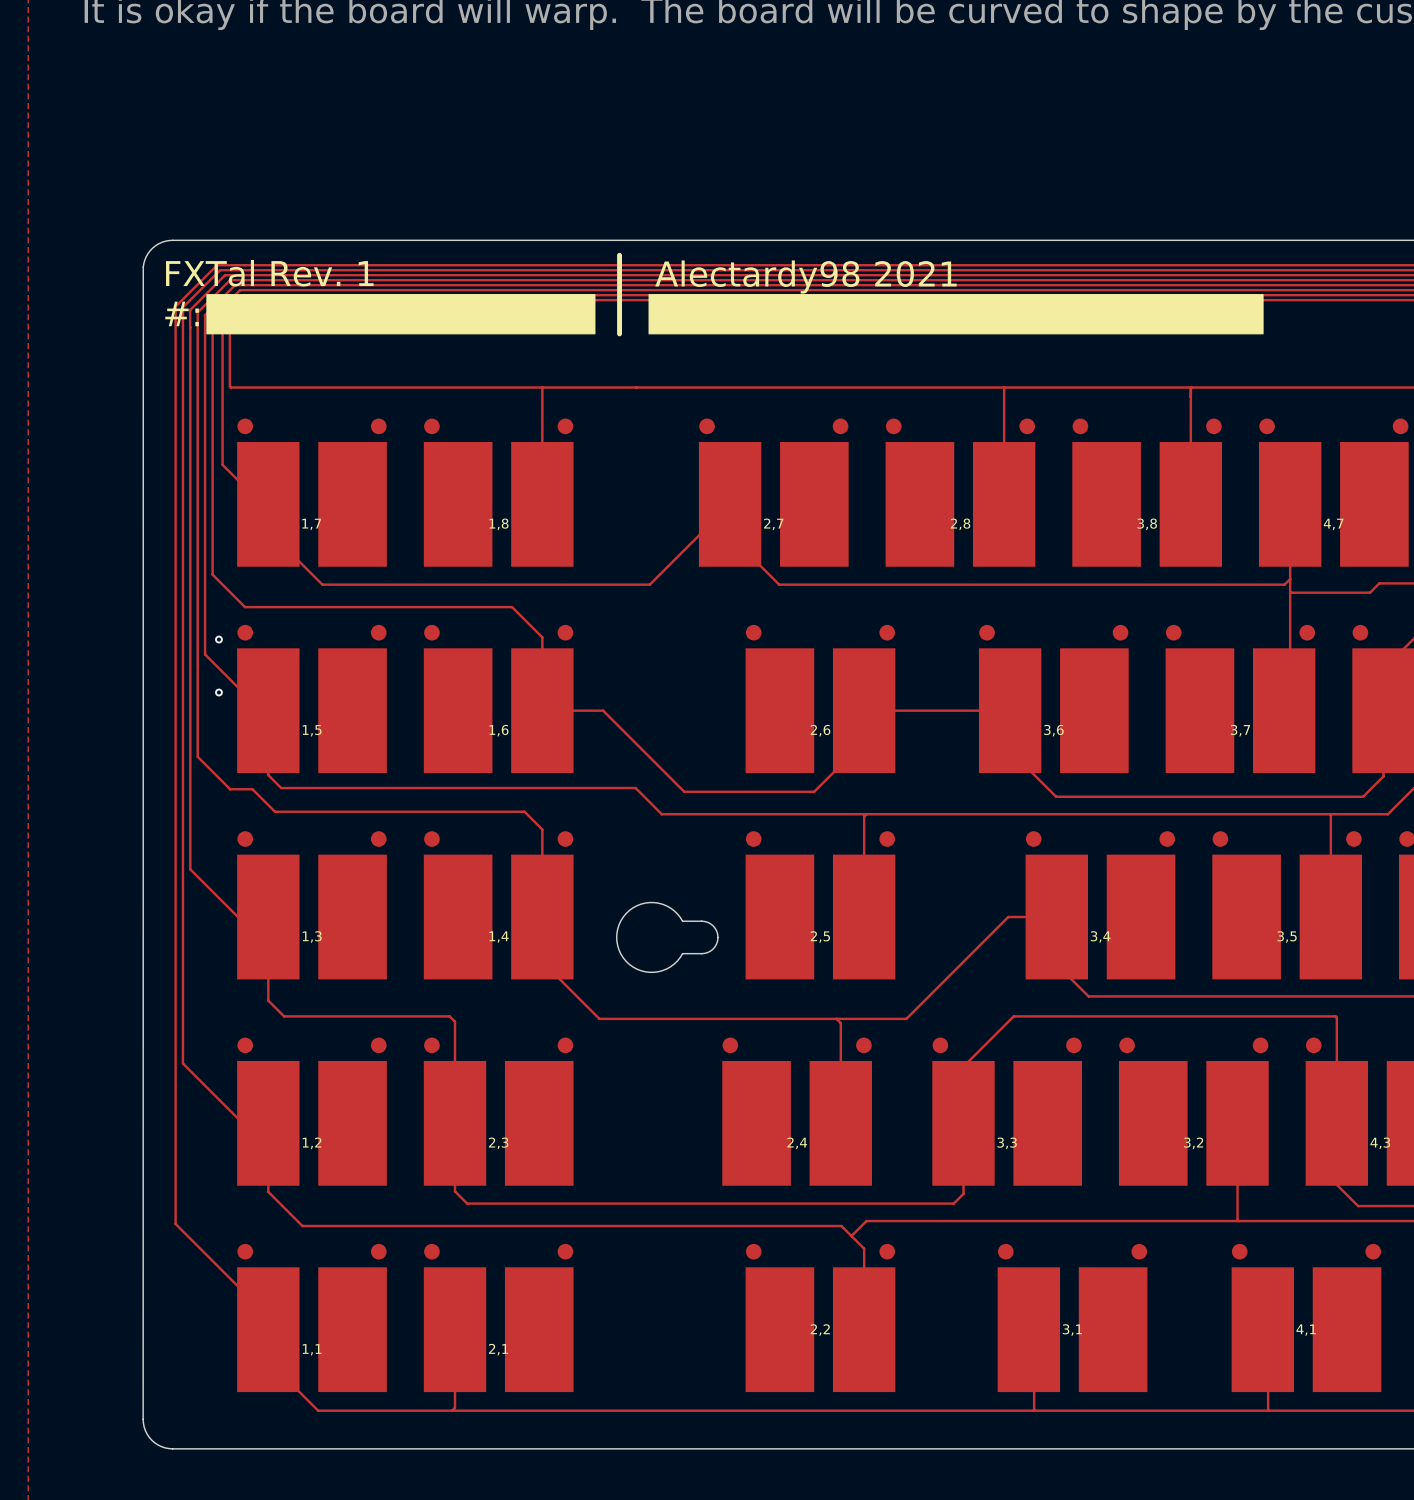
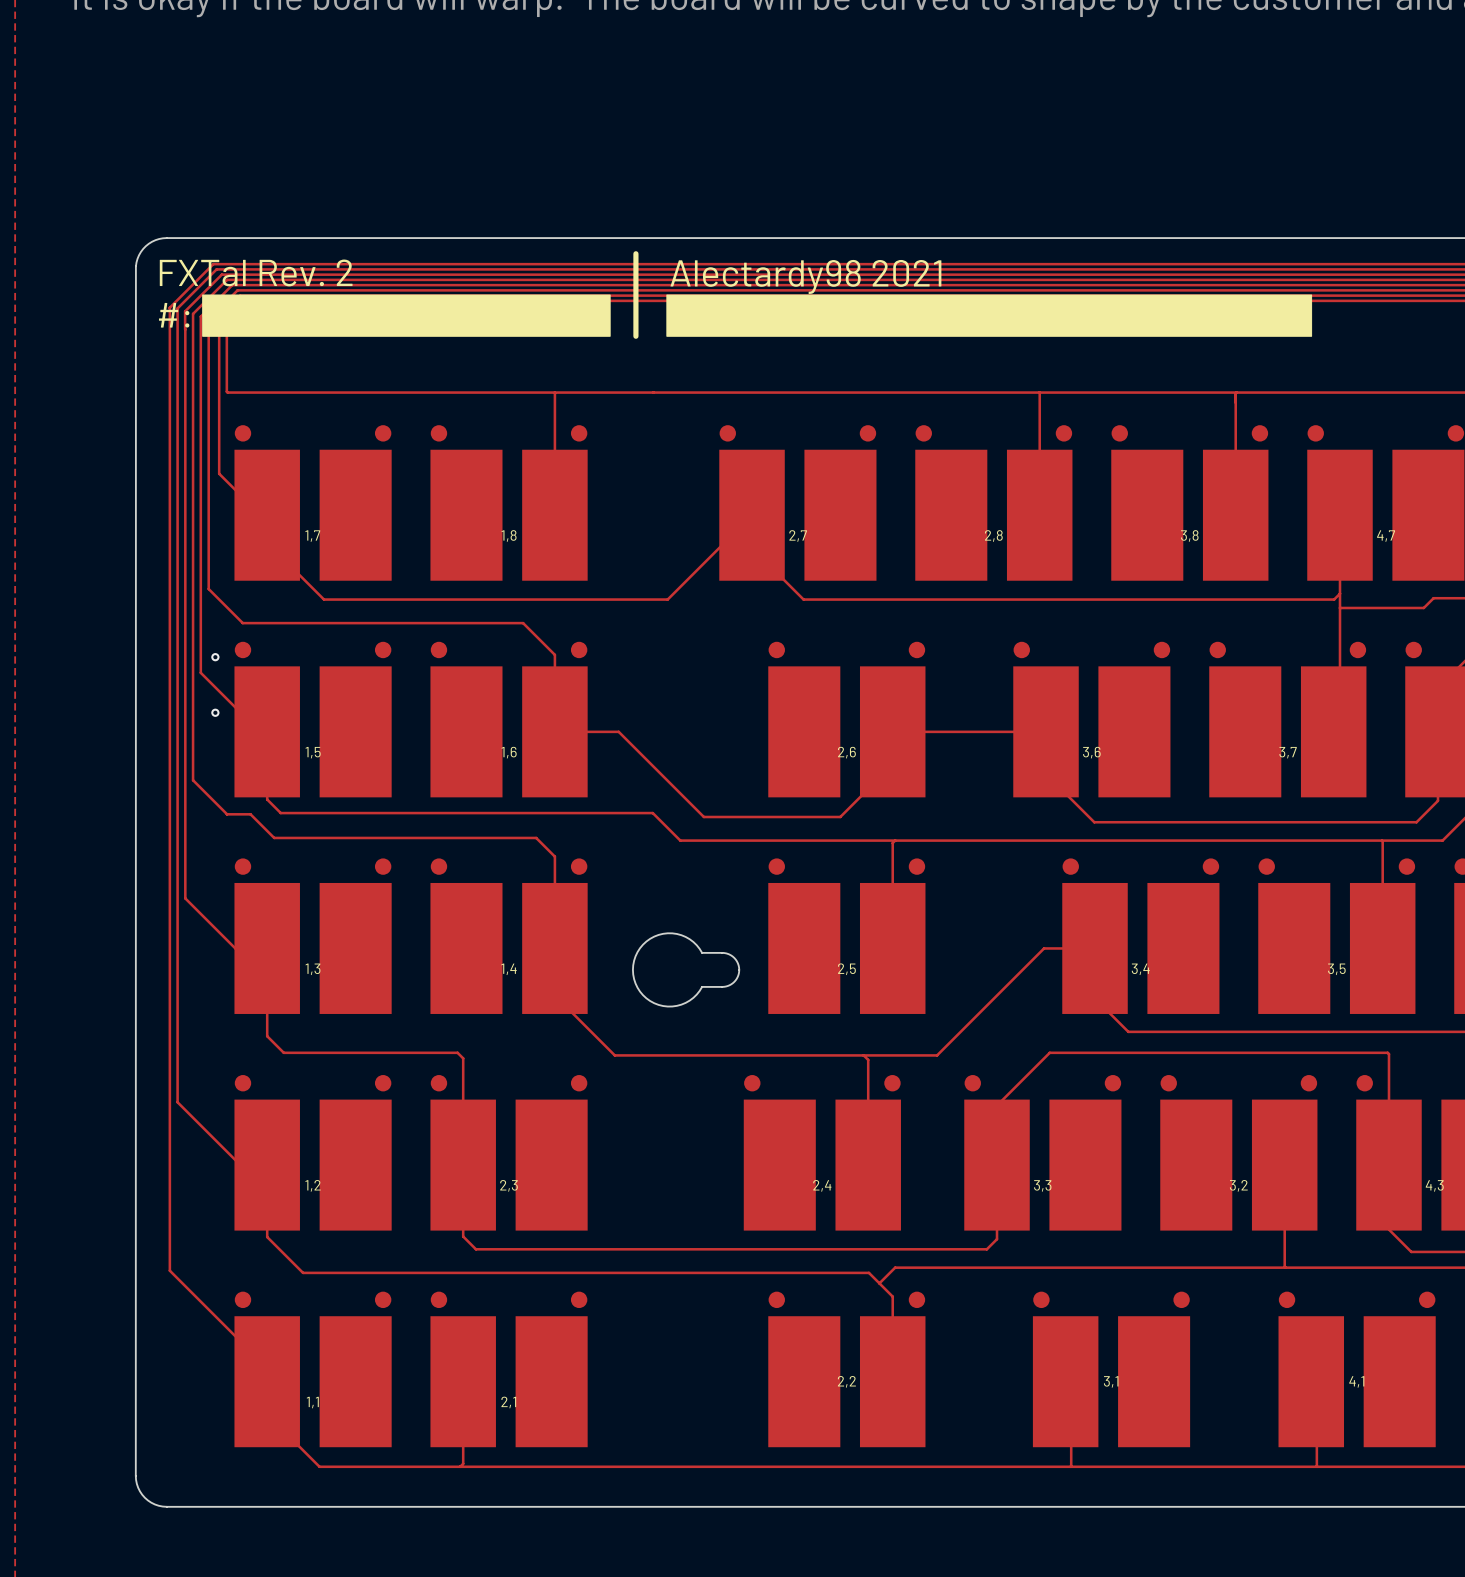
text: FXTal Rev. 1 (269, 273) -> FXTal Rev. 2 (256, 272)

